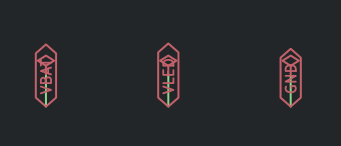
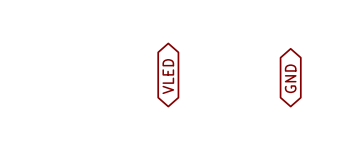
power symbol: (45, 65) -> none
power symbol: (168, 65) -> none
power symbol: (290, 65) -> none
wire: (45, 75) (45, 106) -> none
wire: (168, 75) (168, 106) -> none
wire: (290, 75) (290, 106) -> none
global label: VBAT (45, 76) -> none

